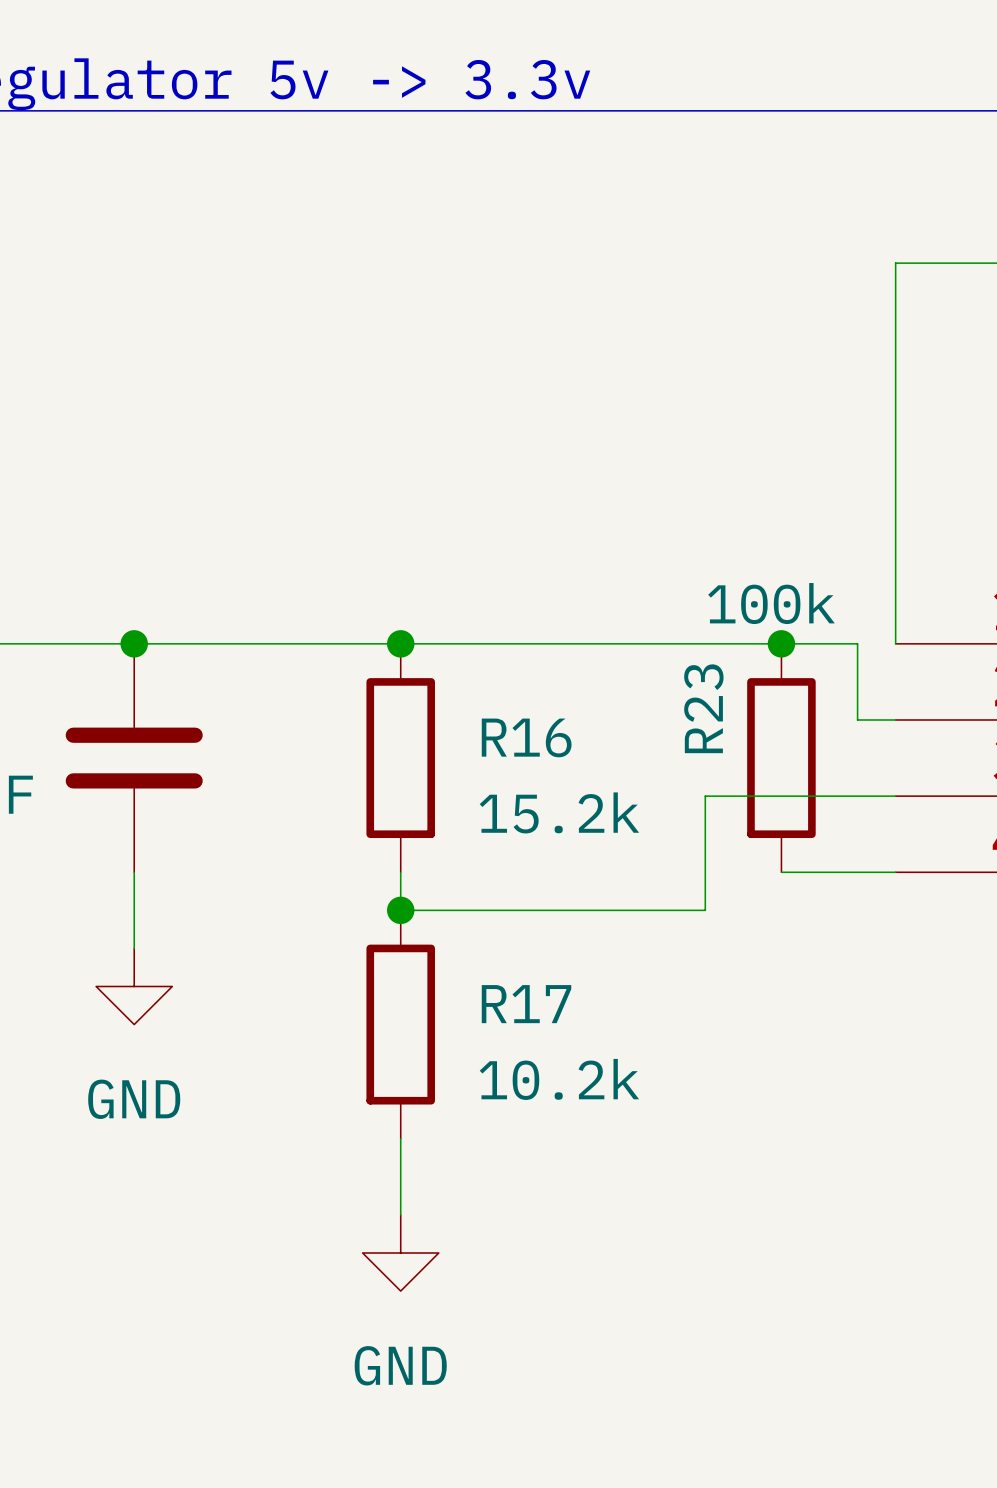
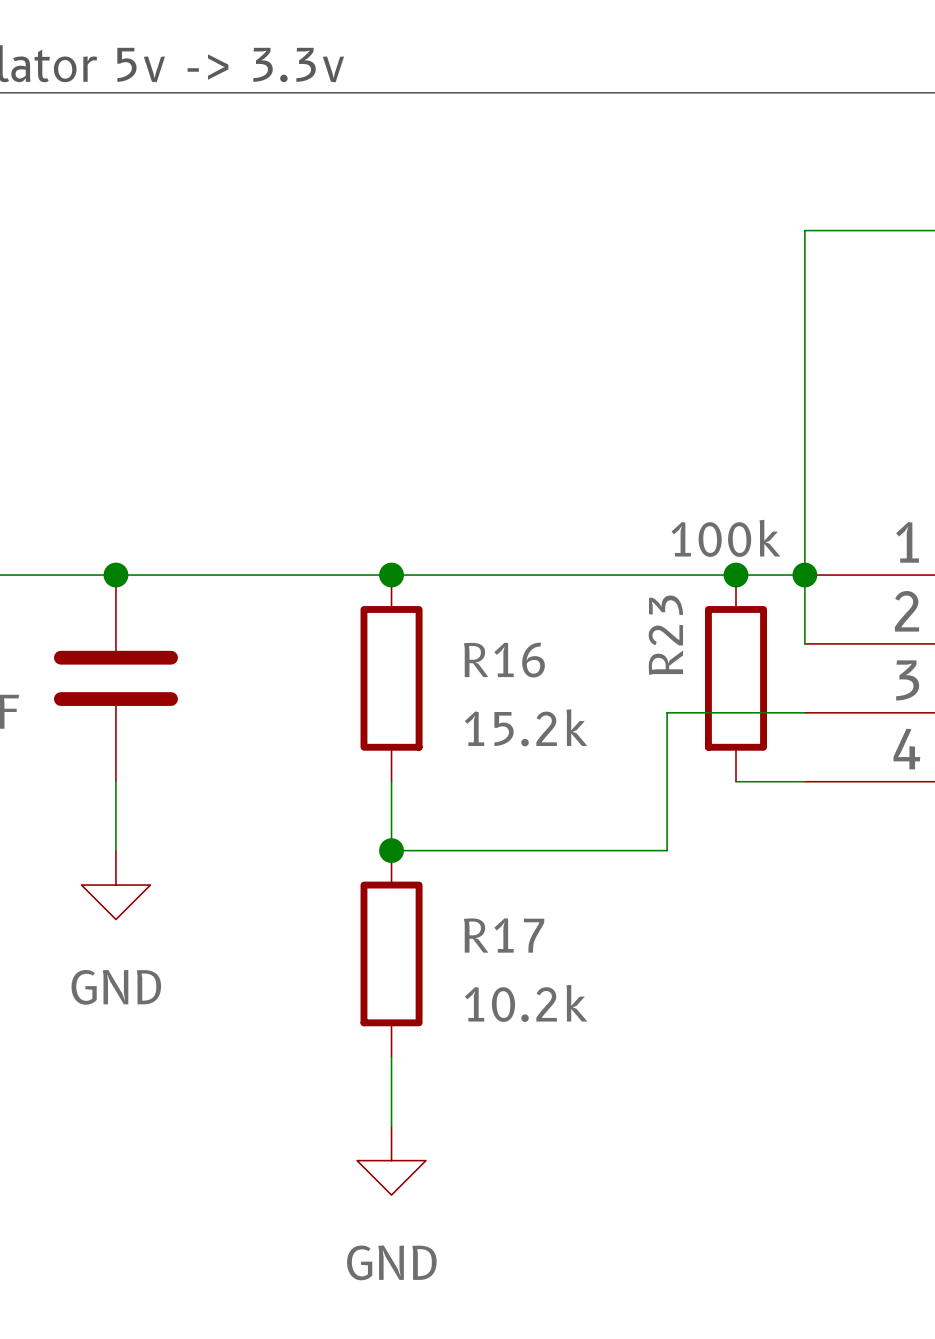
junction position: (400, 643) -> (391, 575)
junction position: (781, 643) -> (735, 575)
wire: (857, 643) (857, 719) (895, 719) -> (770, 575) (804, 575) (804, 643)
junction: none -> (804, 575)
R16 position: (400, 758) -> (391, 678)
R23 position: (781, 758) -> (735, 678)
wire: (743, 796) (705, 796) (705, 910) (400, 910) (400, 872) -> (667, 712) (667, 850) (391, 850) (391, 781)
wire: (781, 872) (819, 872) -> none
junction position: (400, 910) -> (391, 850)
R17 position: (400, 1024) -> (391, 953)
wire: (400, 1138) (400, 1214) -> (391, 1057) (391, 1126)
power symbol position: GND (400, 1253) -> GND (391, 1160)

